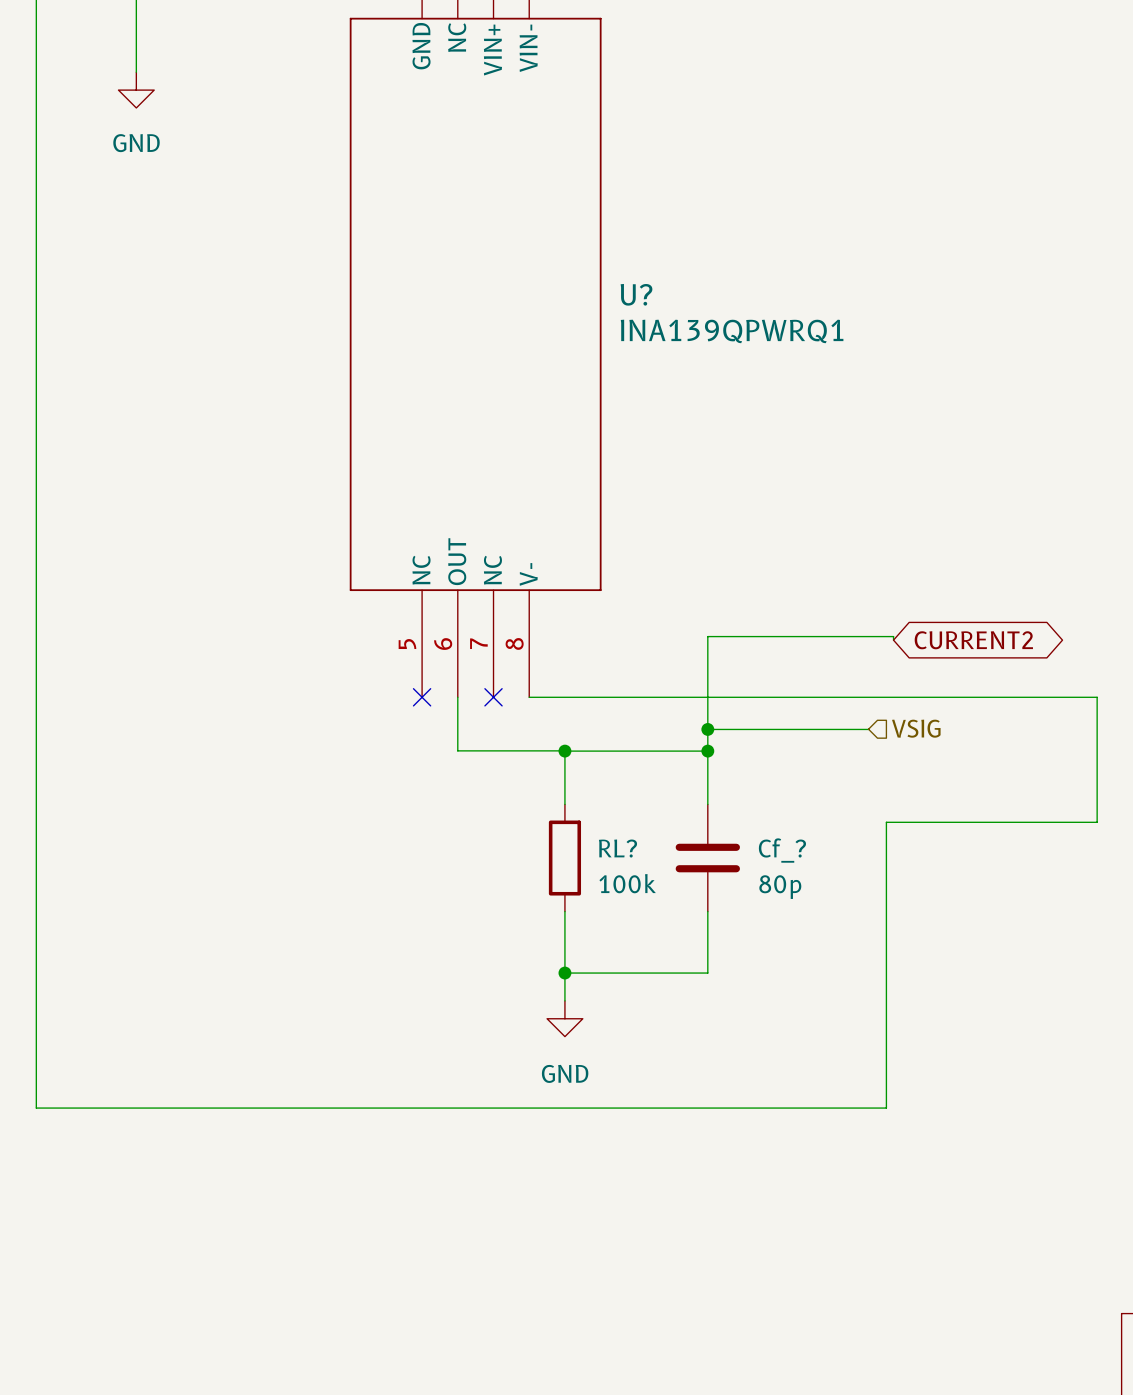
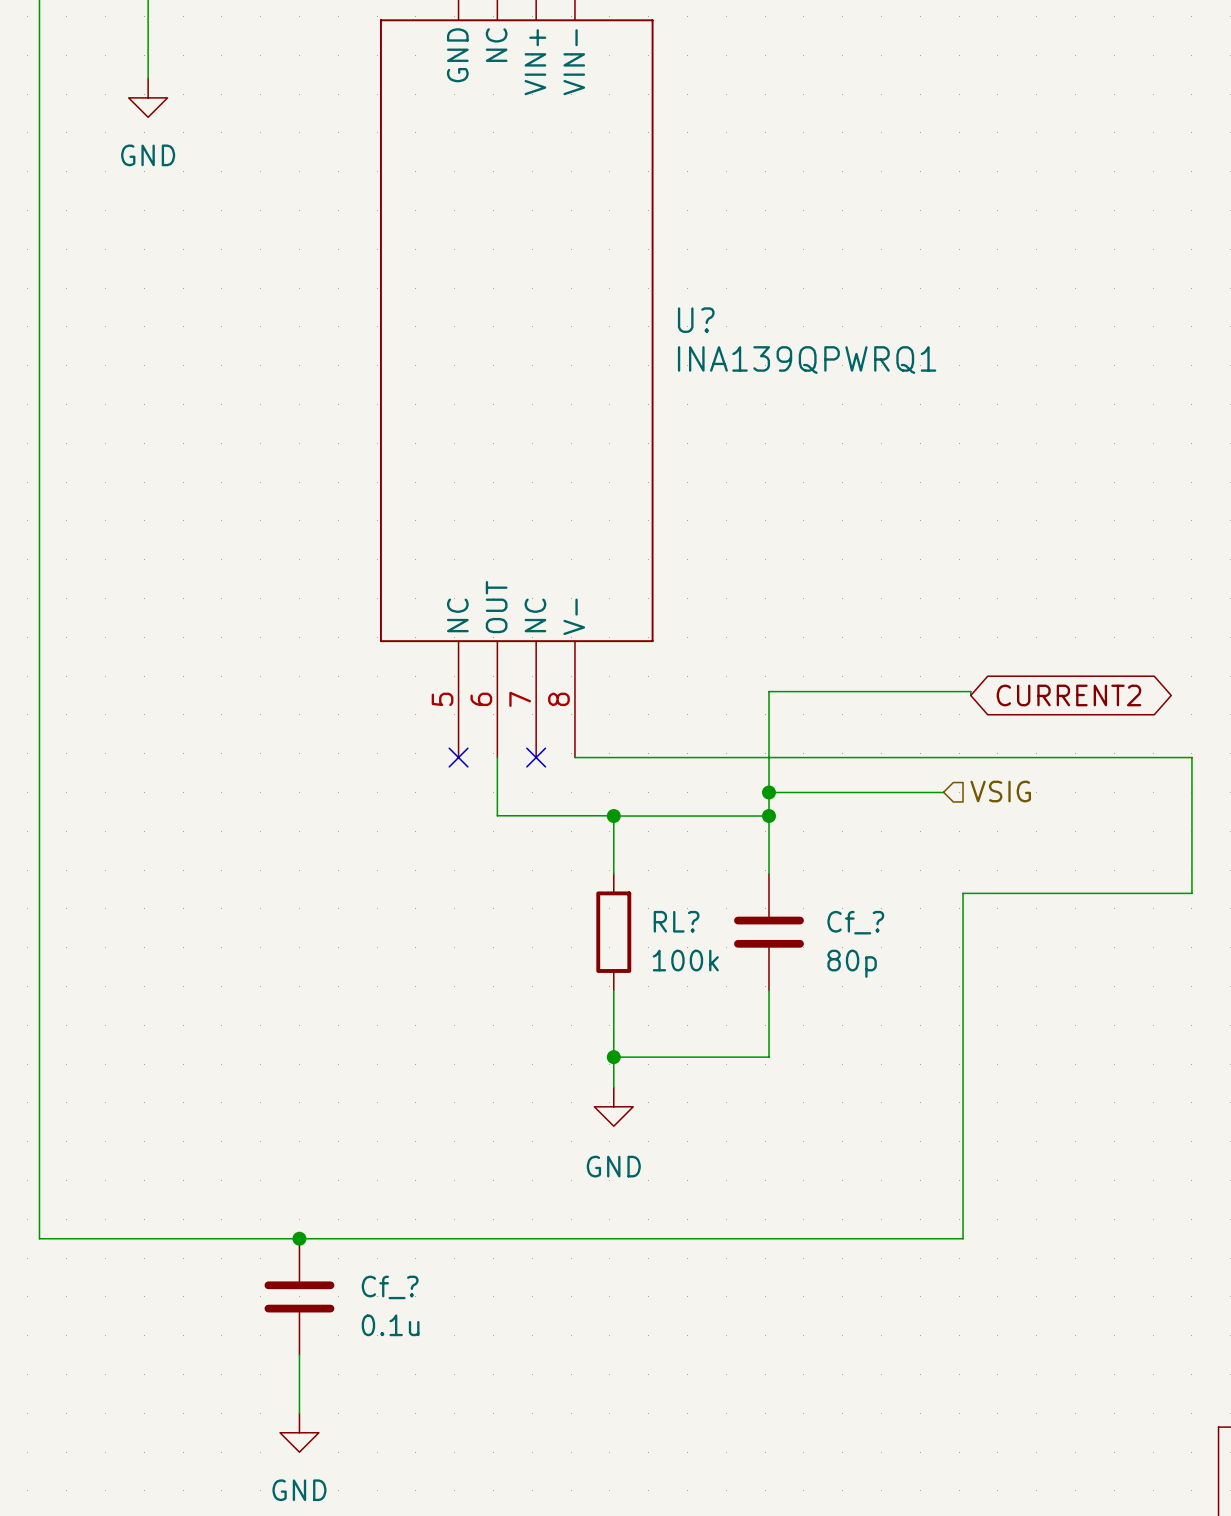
wire: (36, 1108) (886, 1108) -> (39, 1203) (39, 1238) (963, 1238) (963, 1203)
junction: none -> (299, 1238)
Cf_?: none -> 0.1u (299, 1296)
wire: none -> (299, 1355) (299, 1413)
power symbol: none -> GND (299, 1432)

